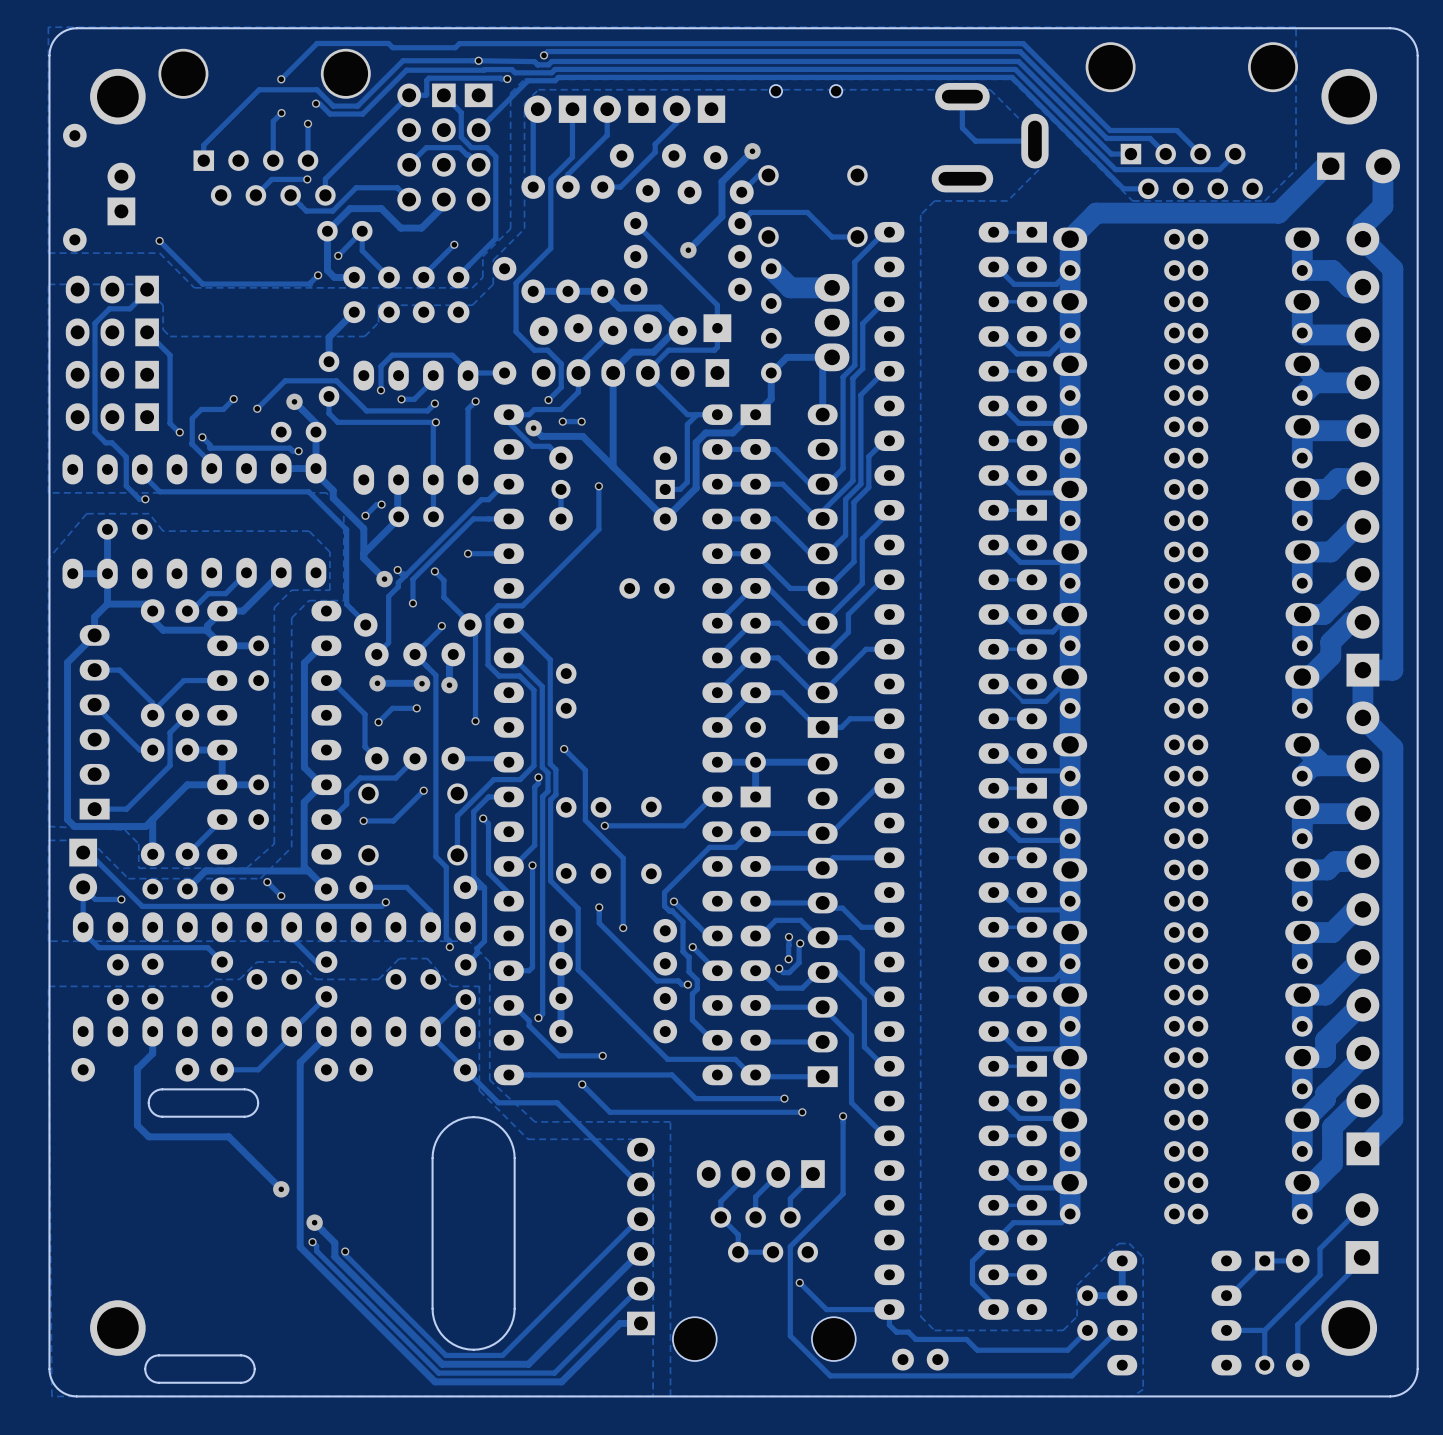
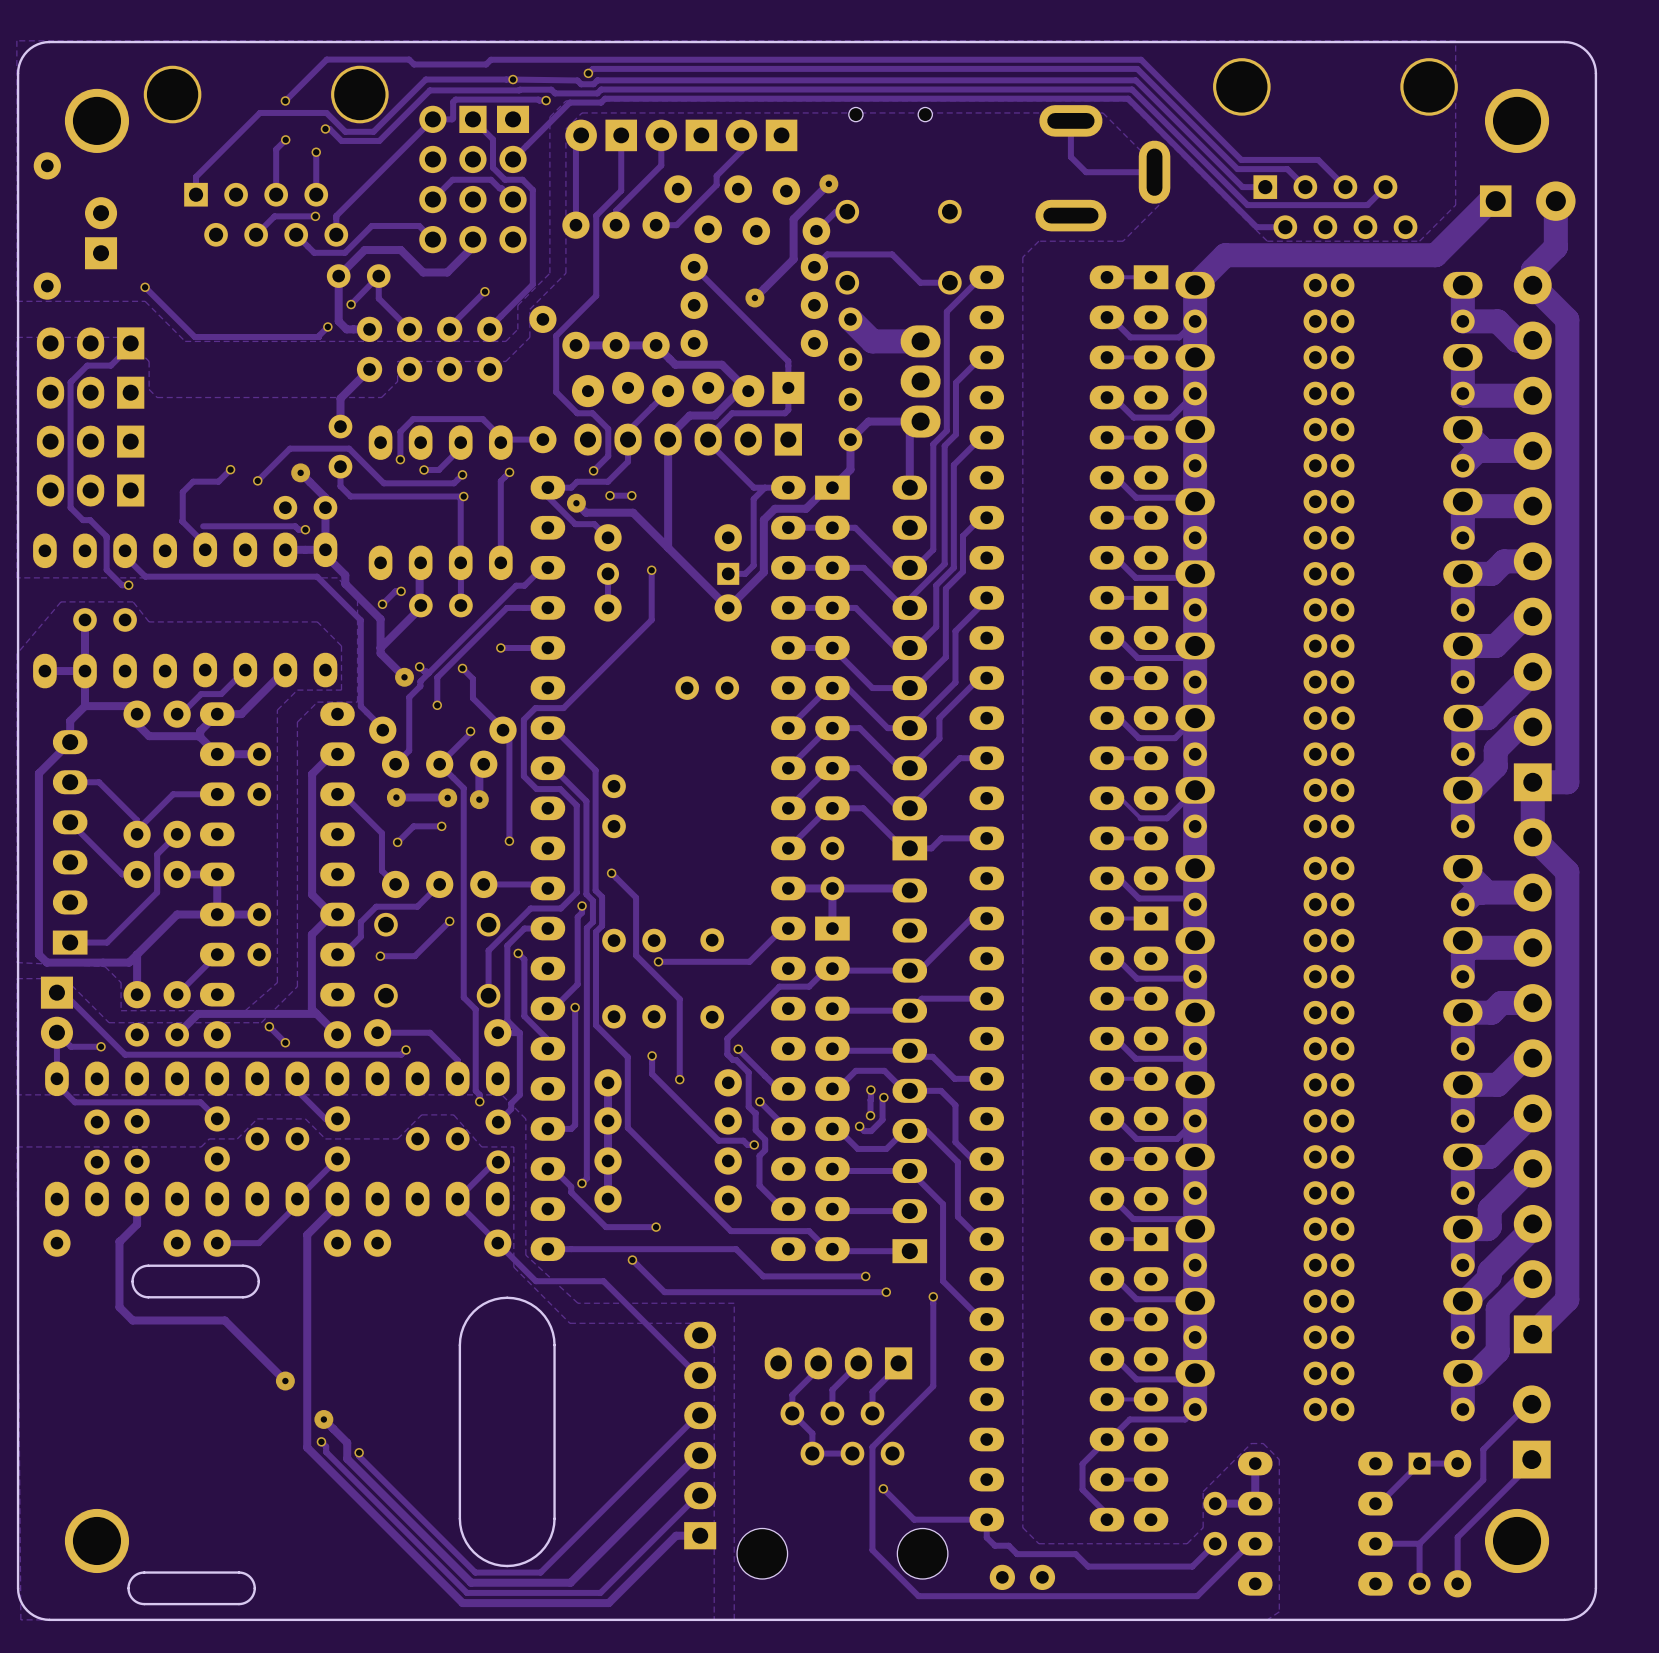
track: (147, 332) (170, 355) (170, 423) (179, 432) -> none
via: (179, 432) -> none
track: (202, 437) (209, 444) (209, 448) -> none
via: (202, 437) -> none

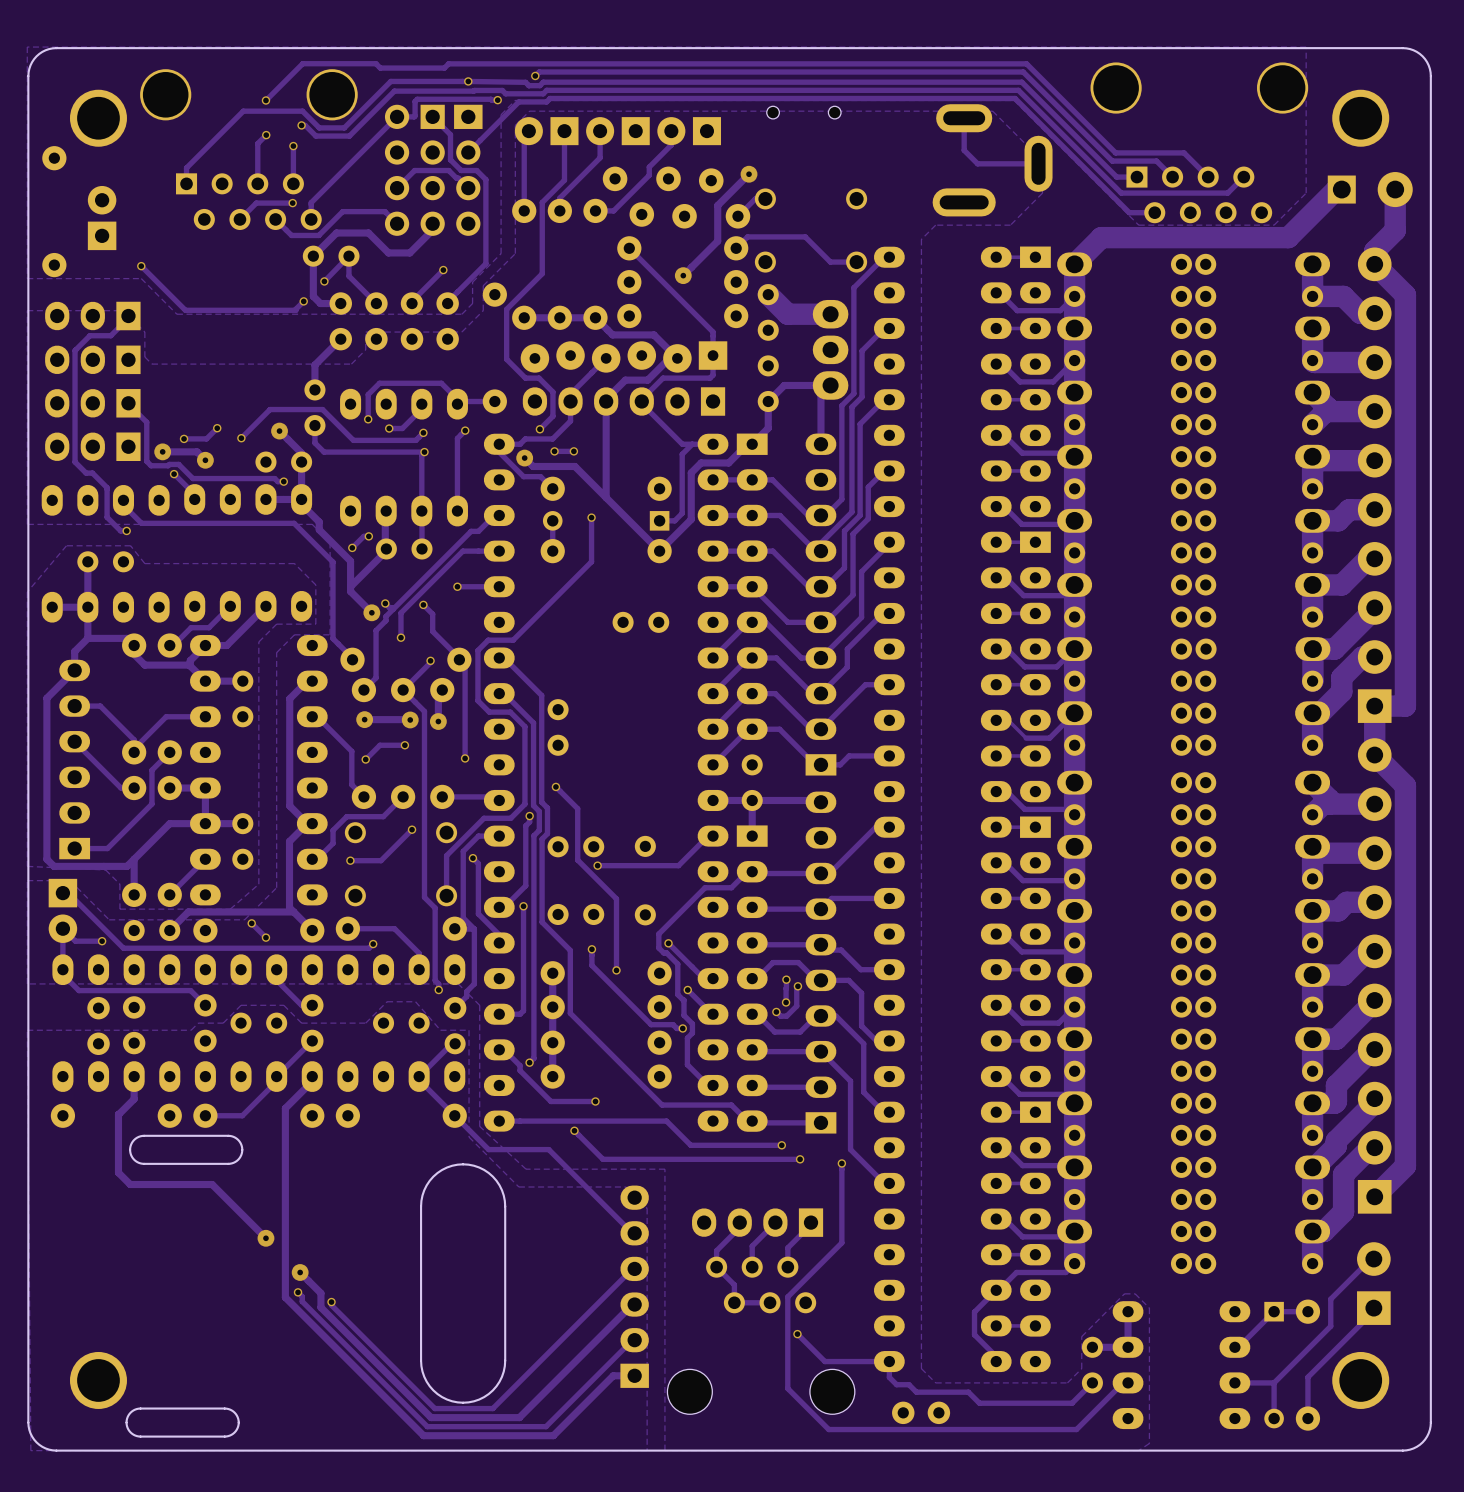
track: none -> (129, 402) (146, 422) (146, 461) (151, 465) (178, 464) (192, 478)
track: (193, 481) (182, 492) (182, 521) -> none
via: none -> (184, 438)
track: none -> (162, 451) (196, 451) (205, 460)
via: none -> (162, 451)
via: none -> (205, 460)
via: none -> (174, 474)

